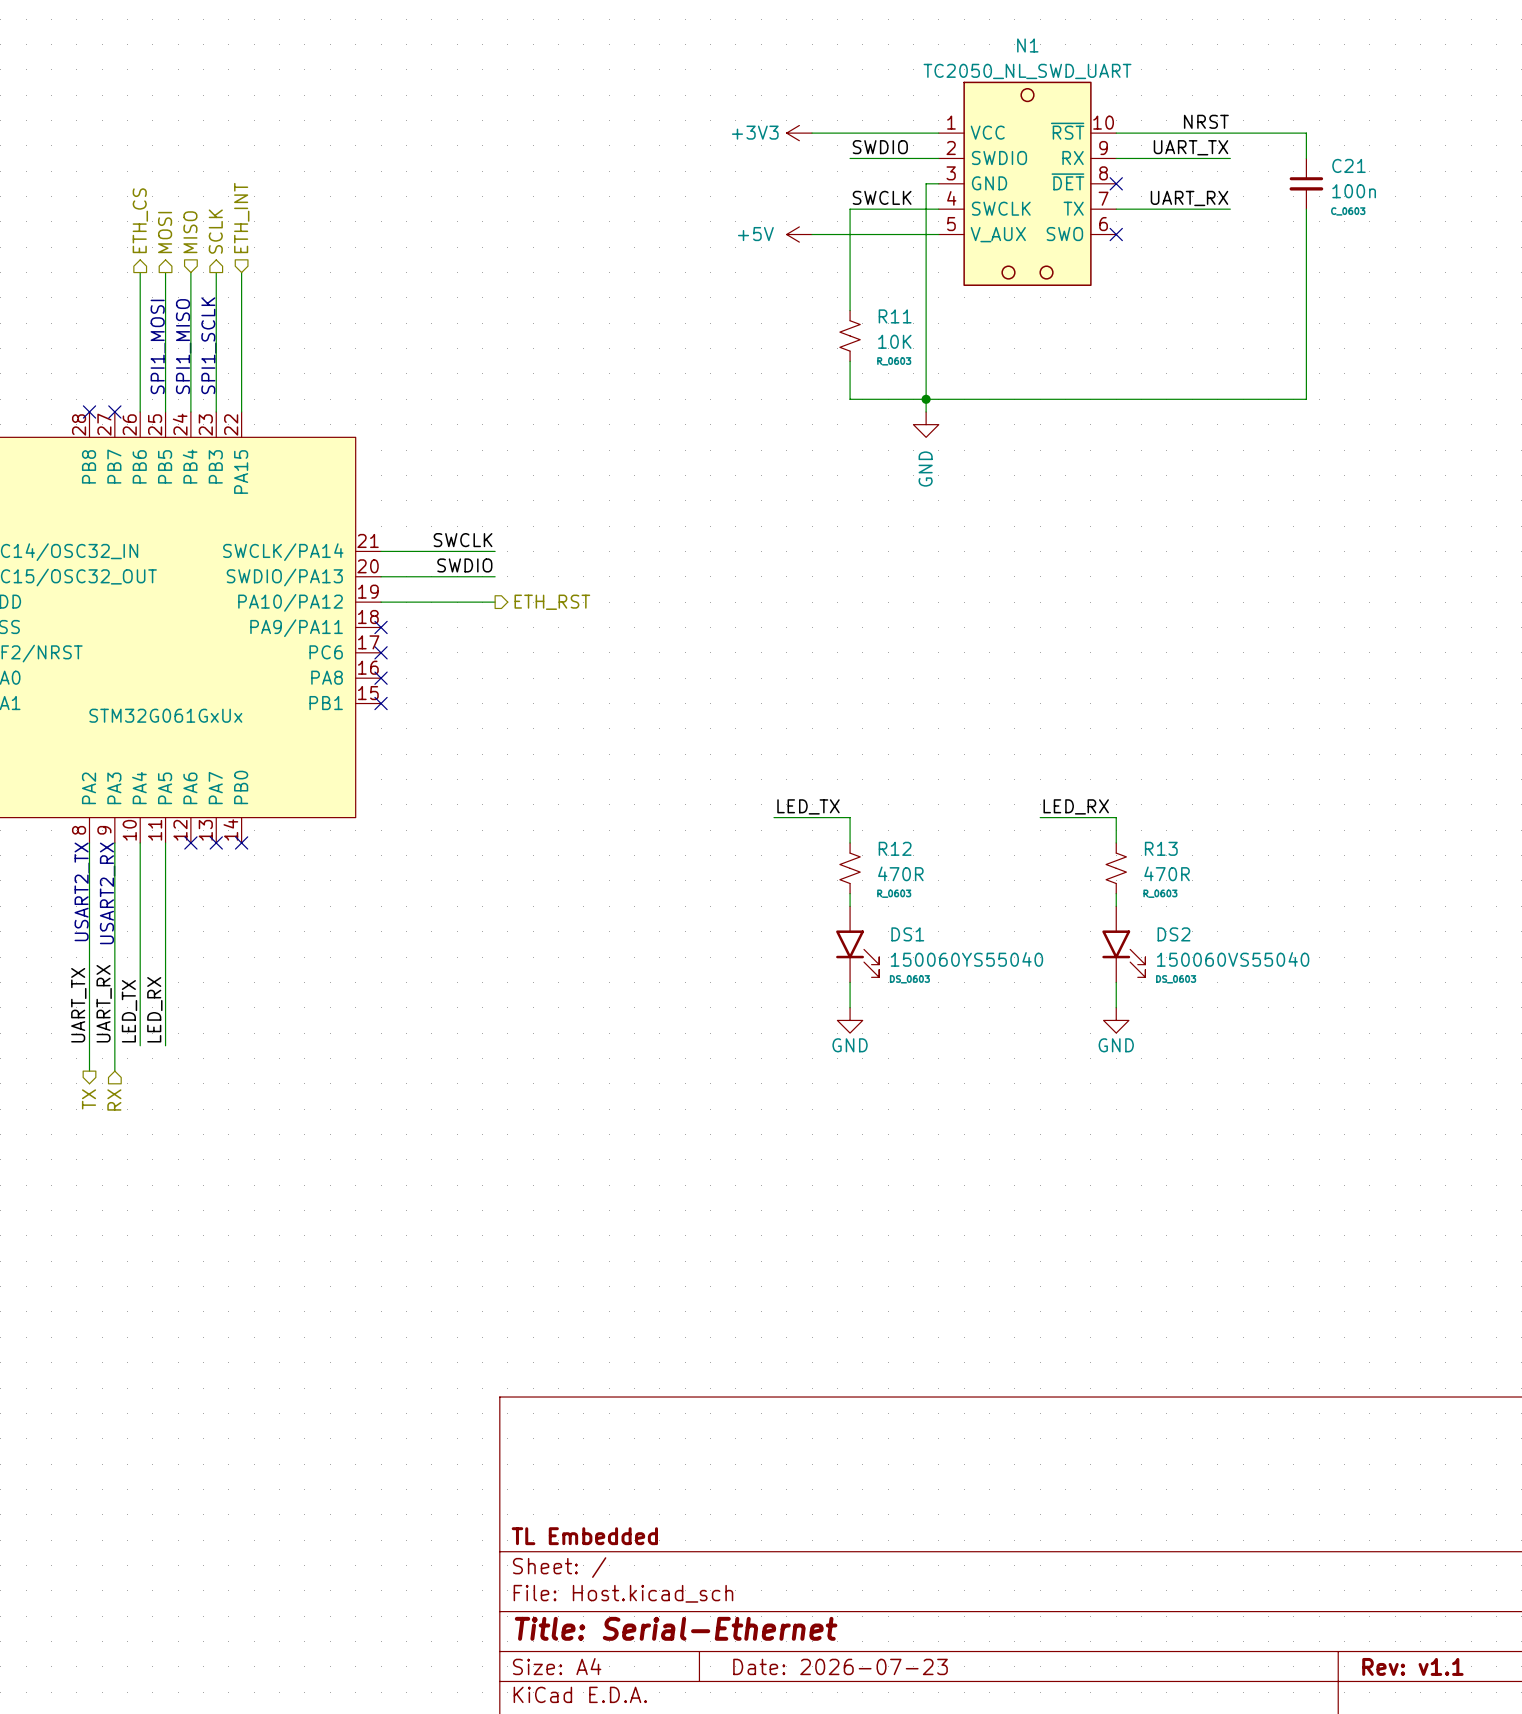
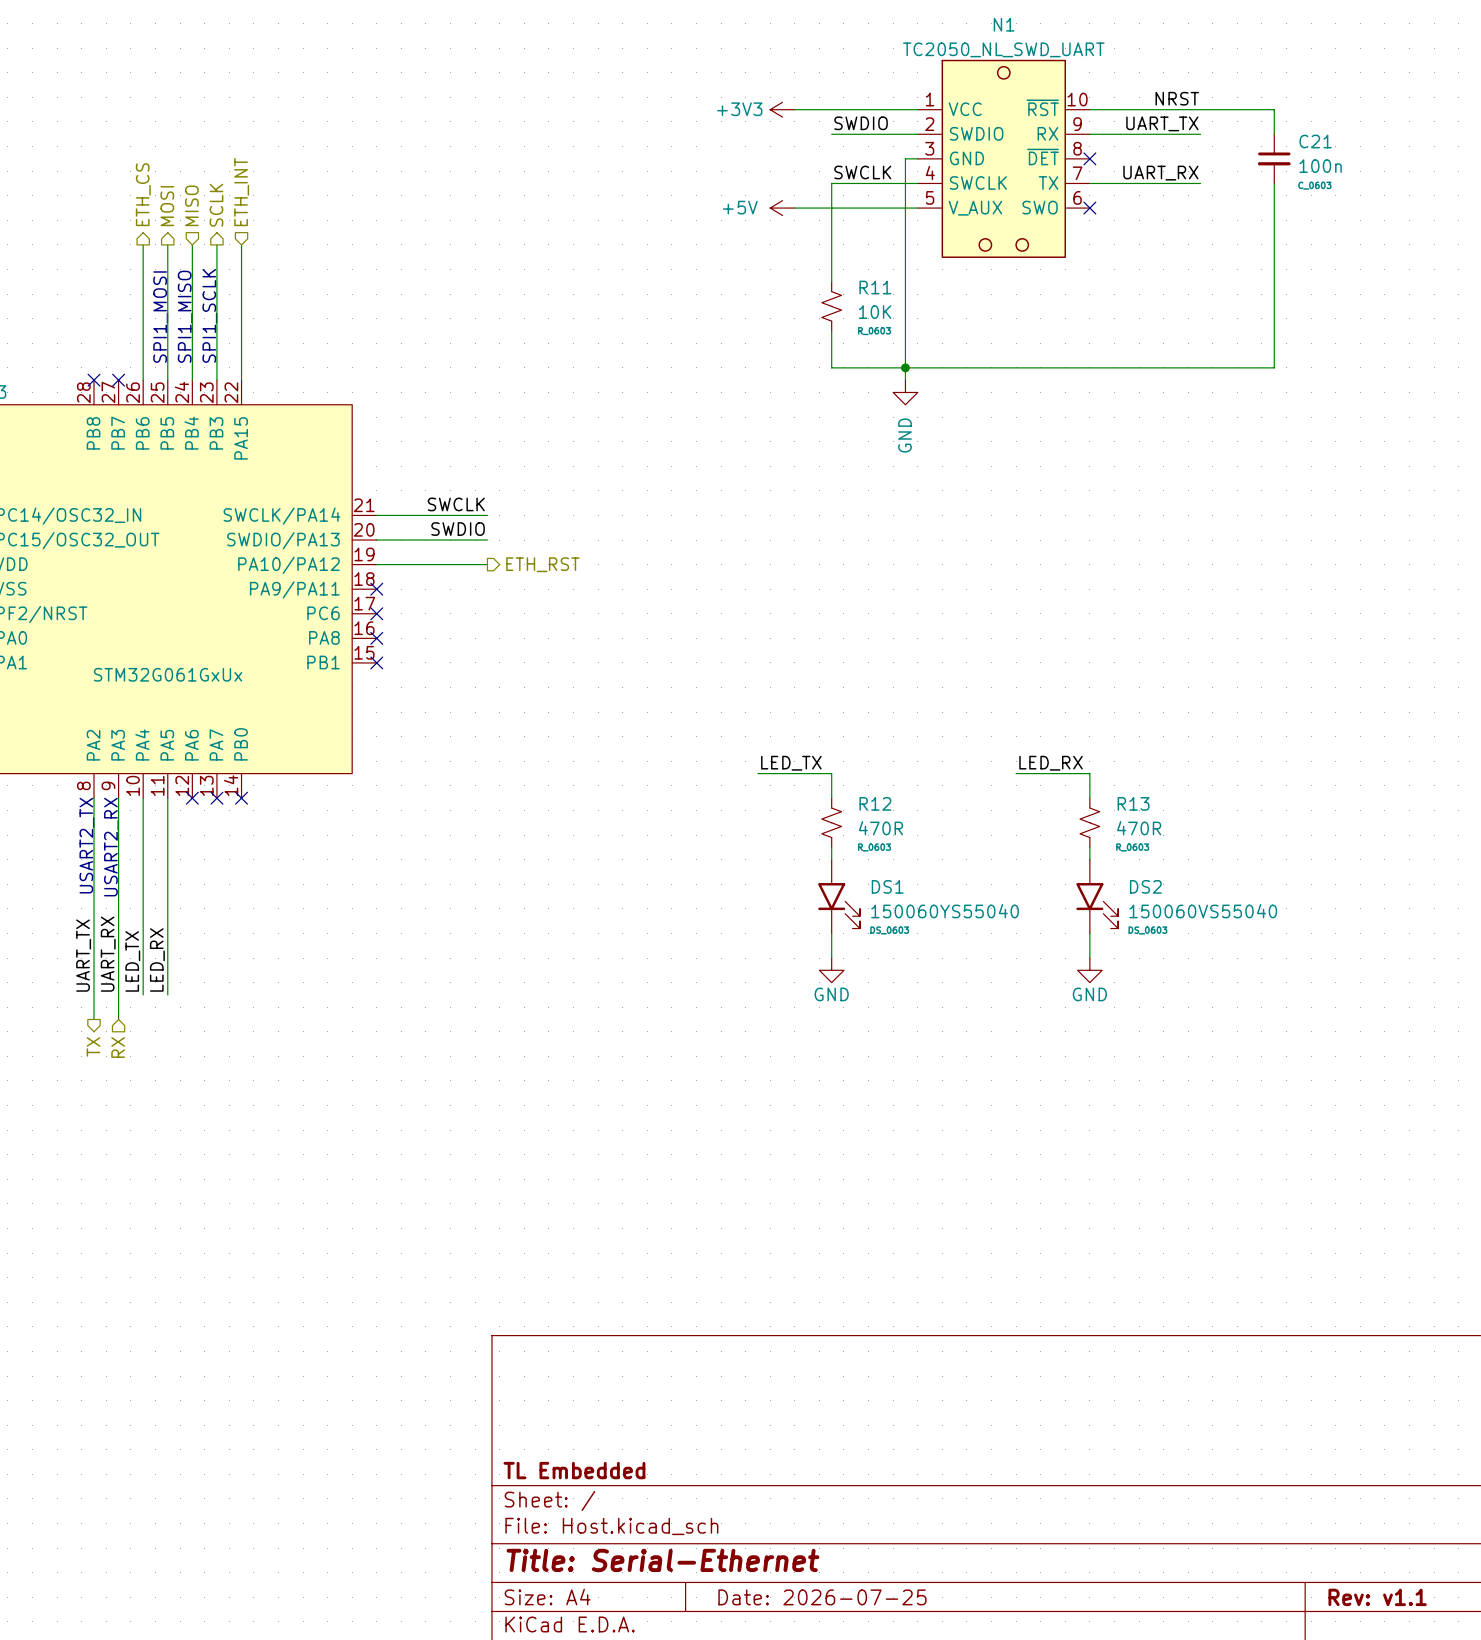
title block: Date: 2026-07-23 (840, 1666) -> Date: 2026-07-25 (822, 1597)

